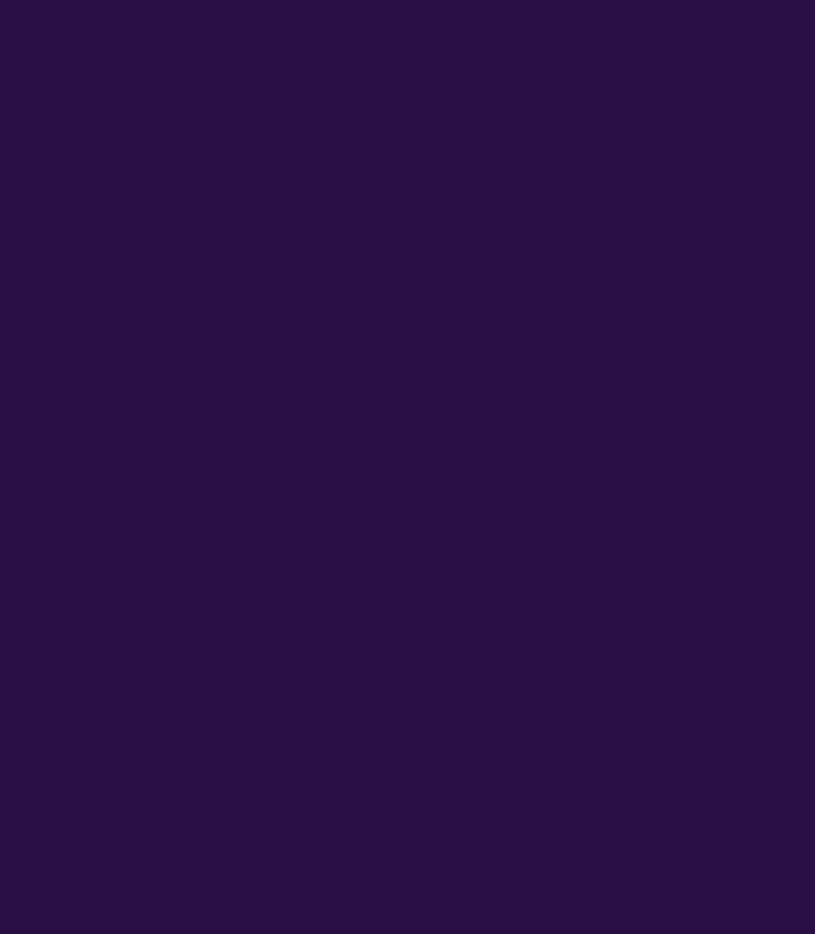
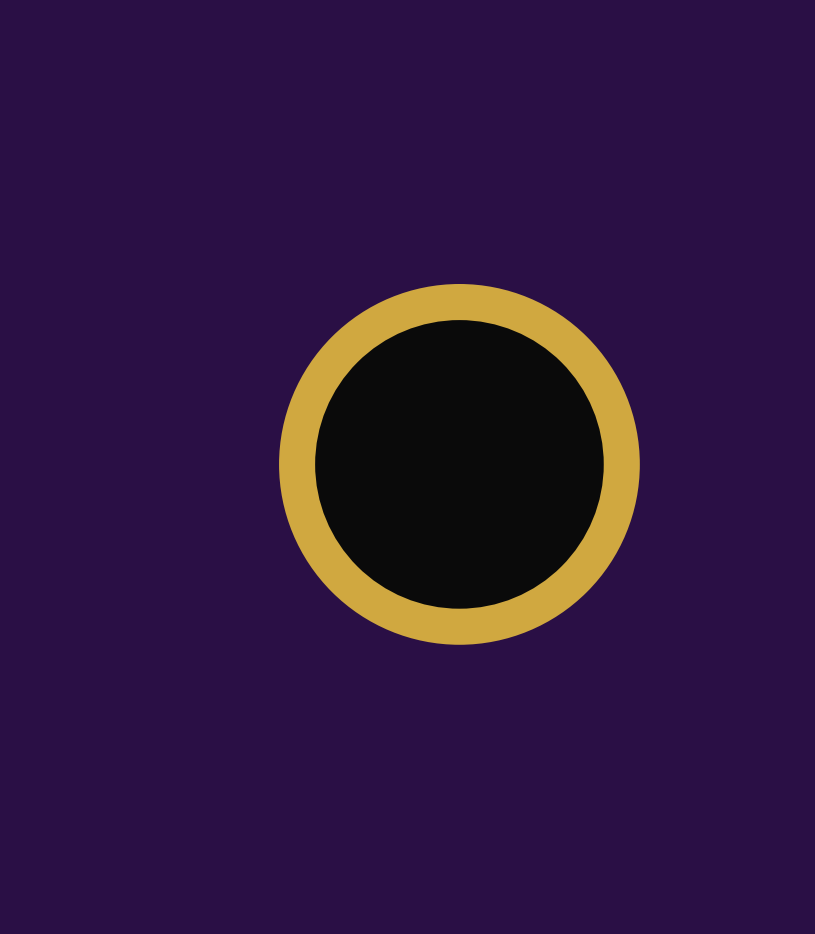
via: none -> (459, 464)

